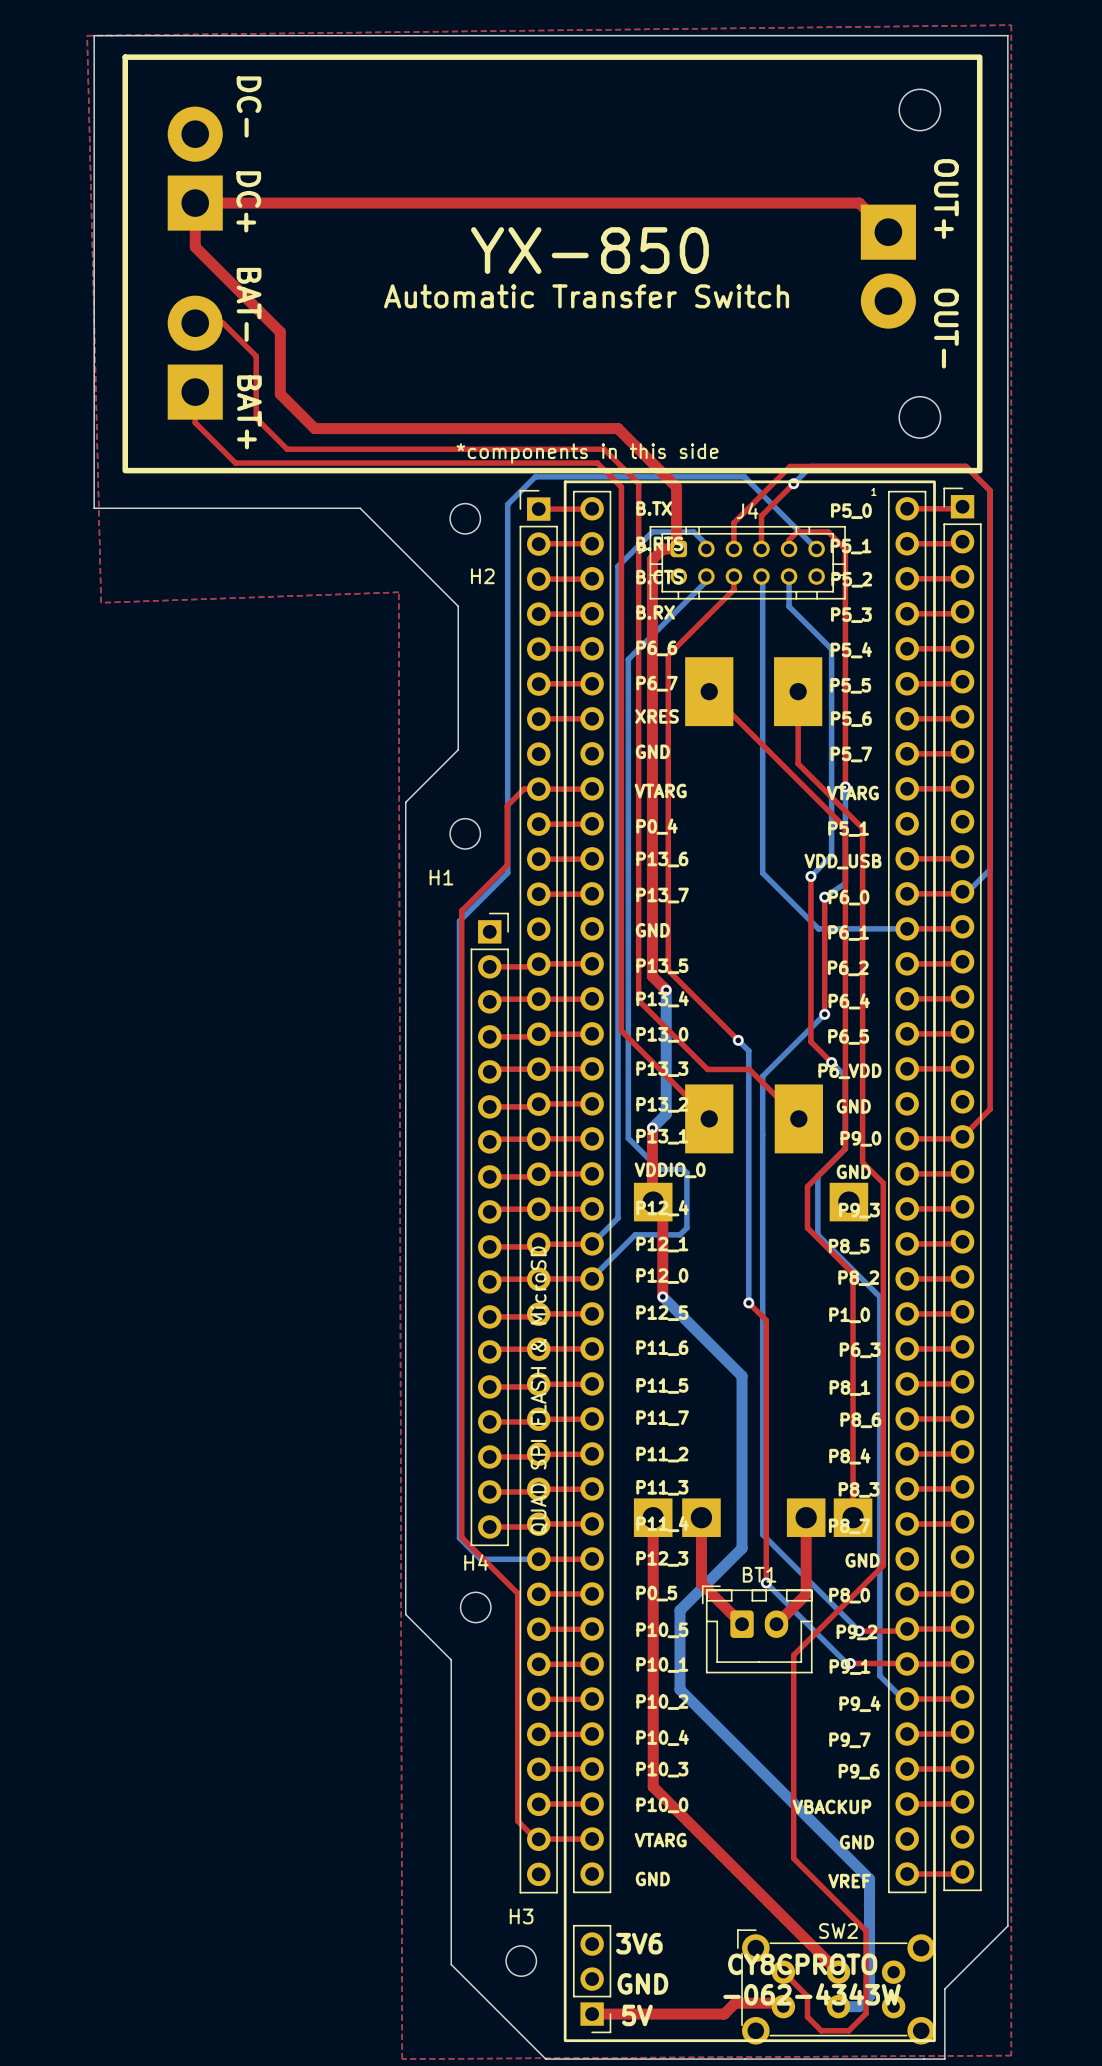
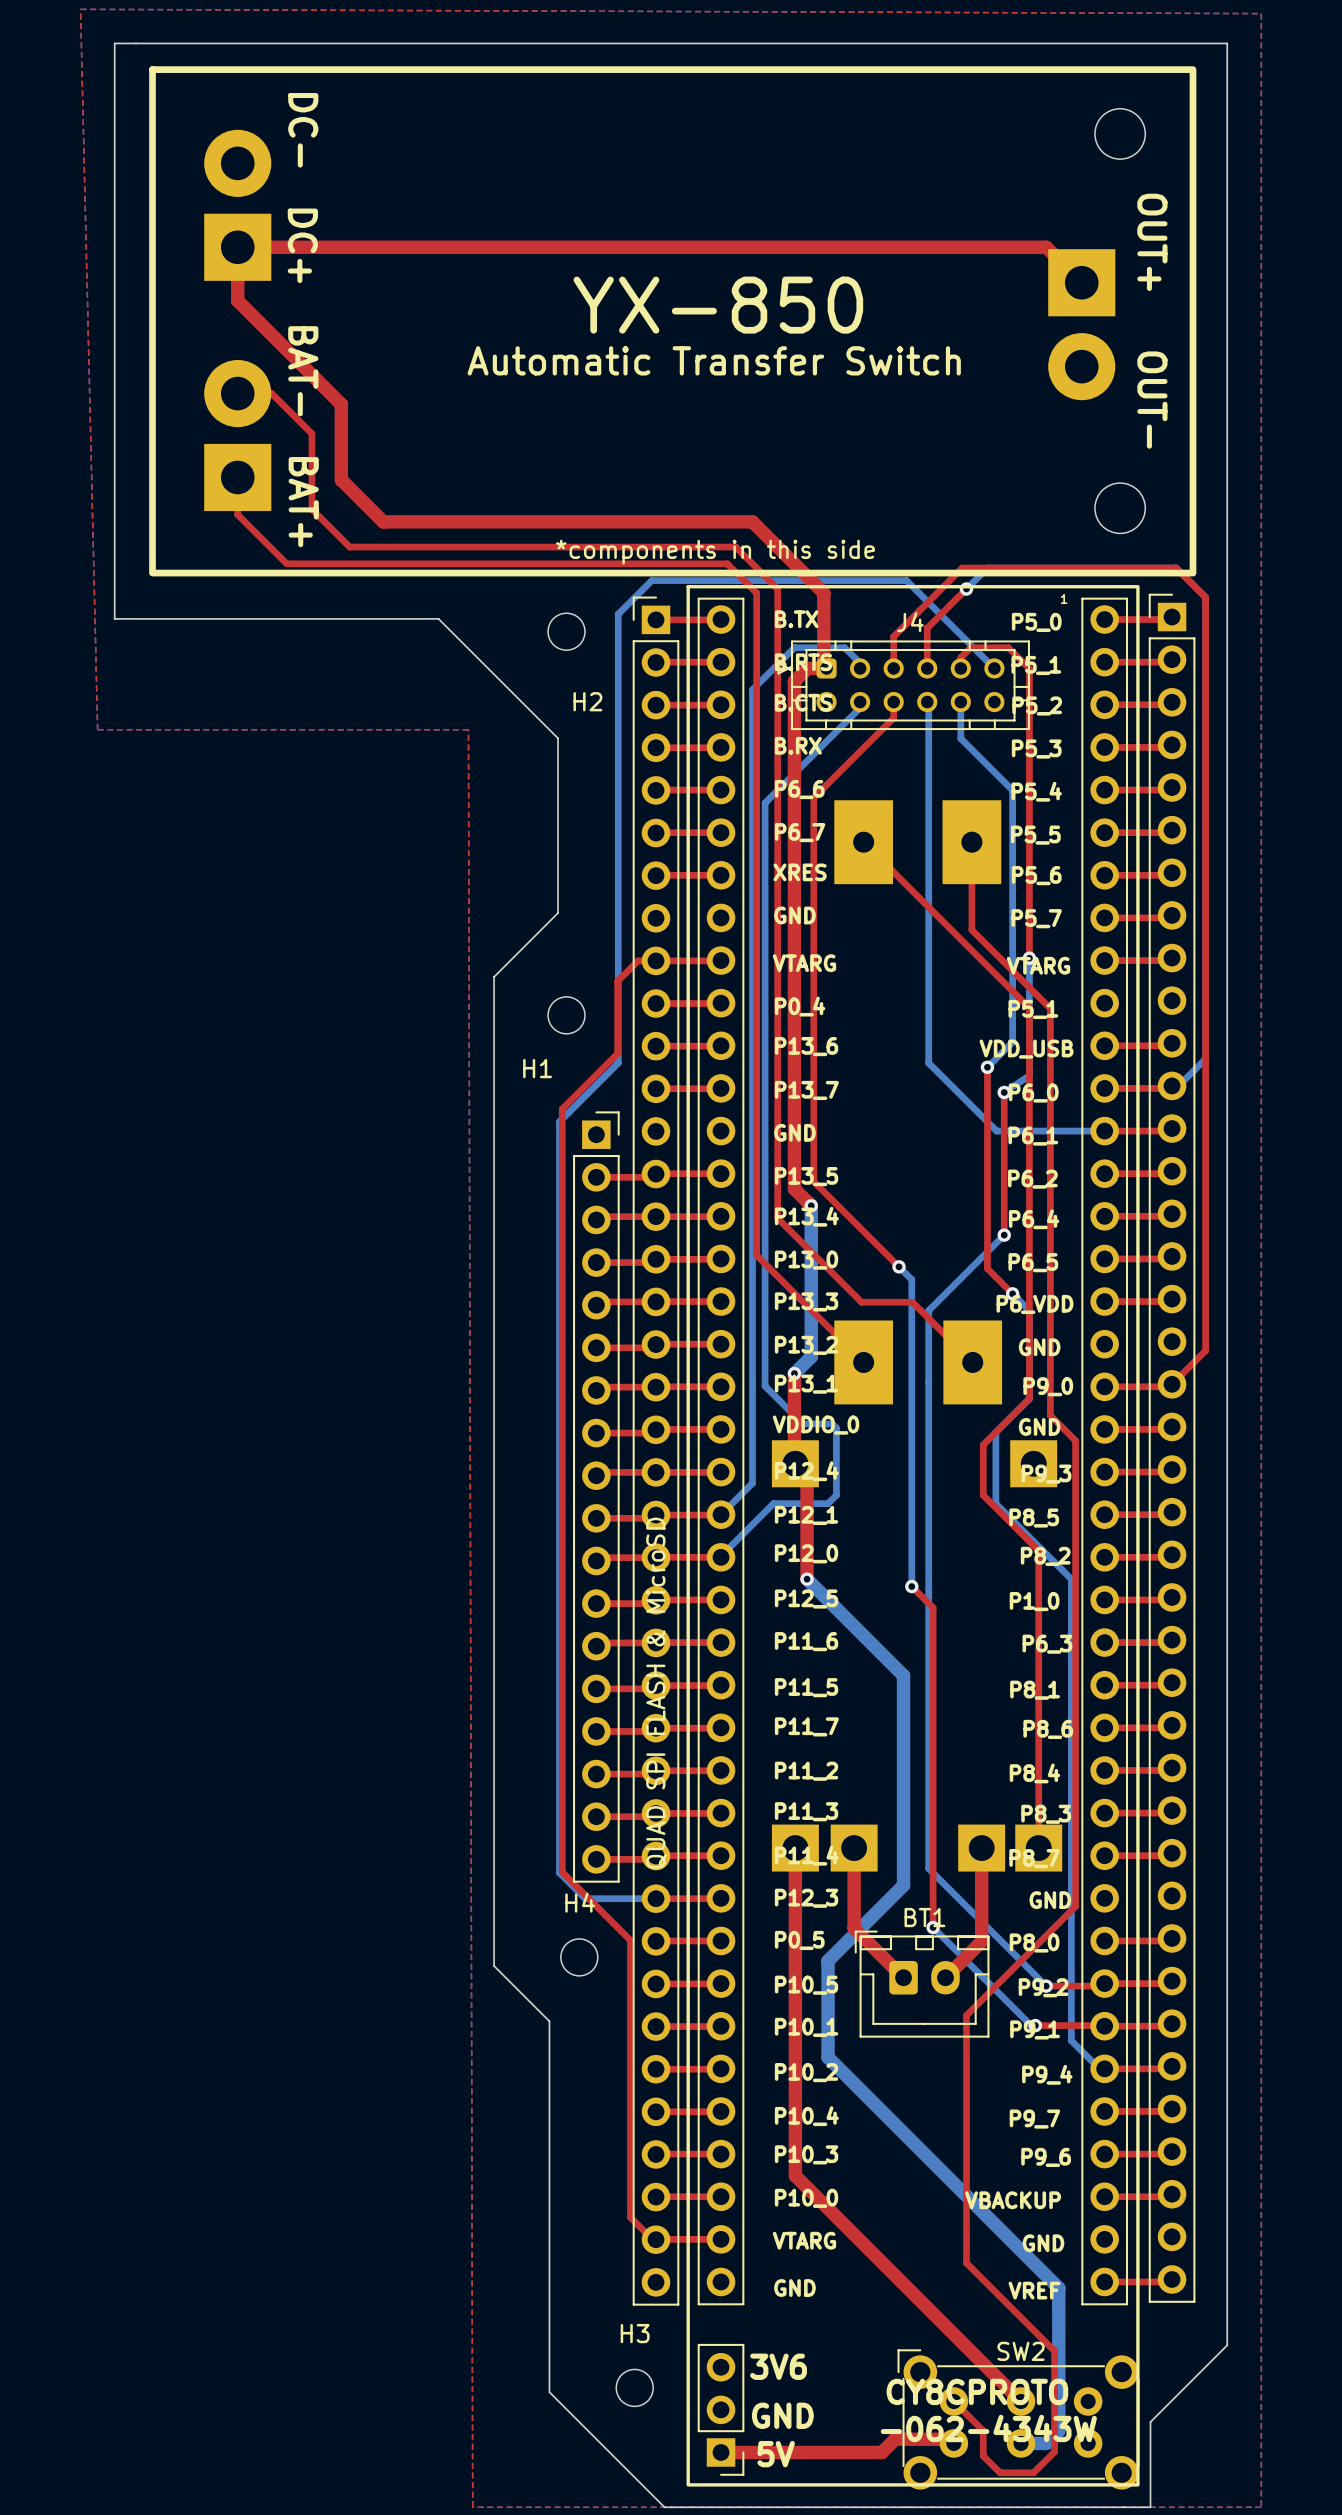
top zone outline: (1011, 25) (87, 35) (101, 602) (398, 592) (402, 2059) (1011, 2055) (1011, 25) -> (80, 9) (97, 729) (468, 729) (472, 2507) (1261, 2507) (1261, 13) (80, 9)

